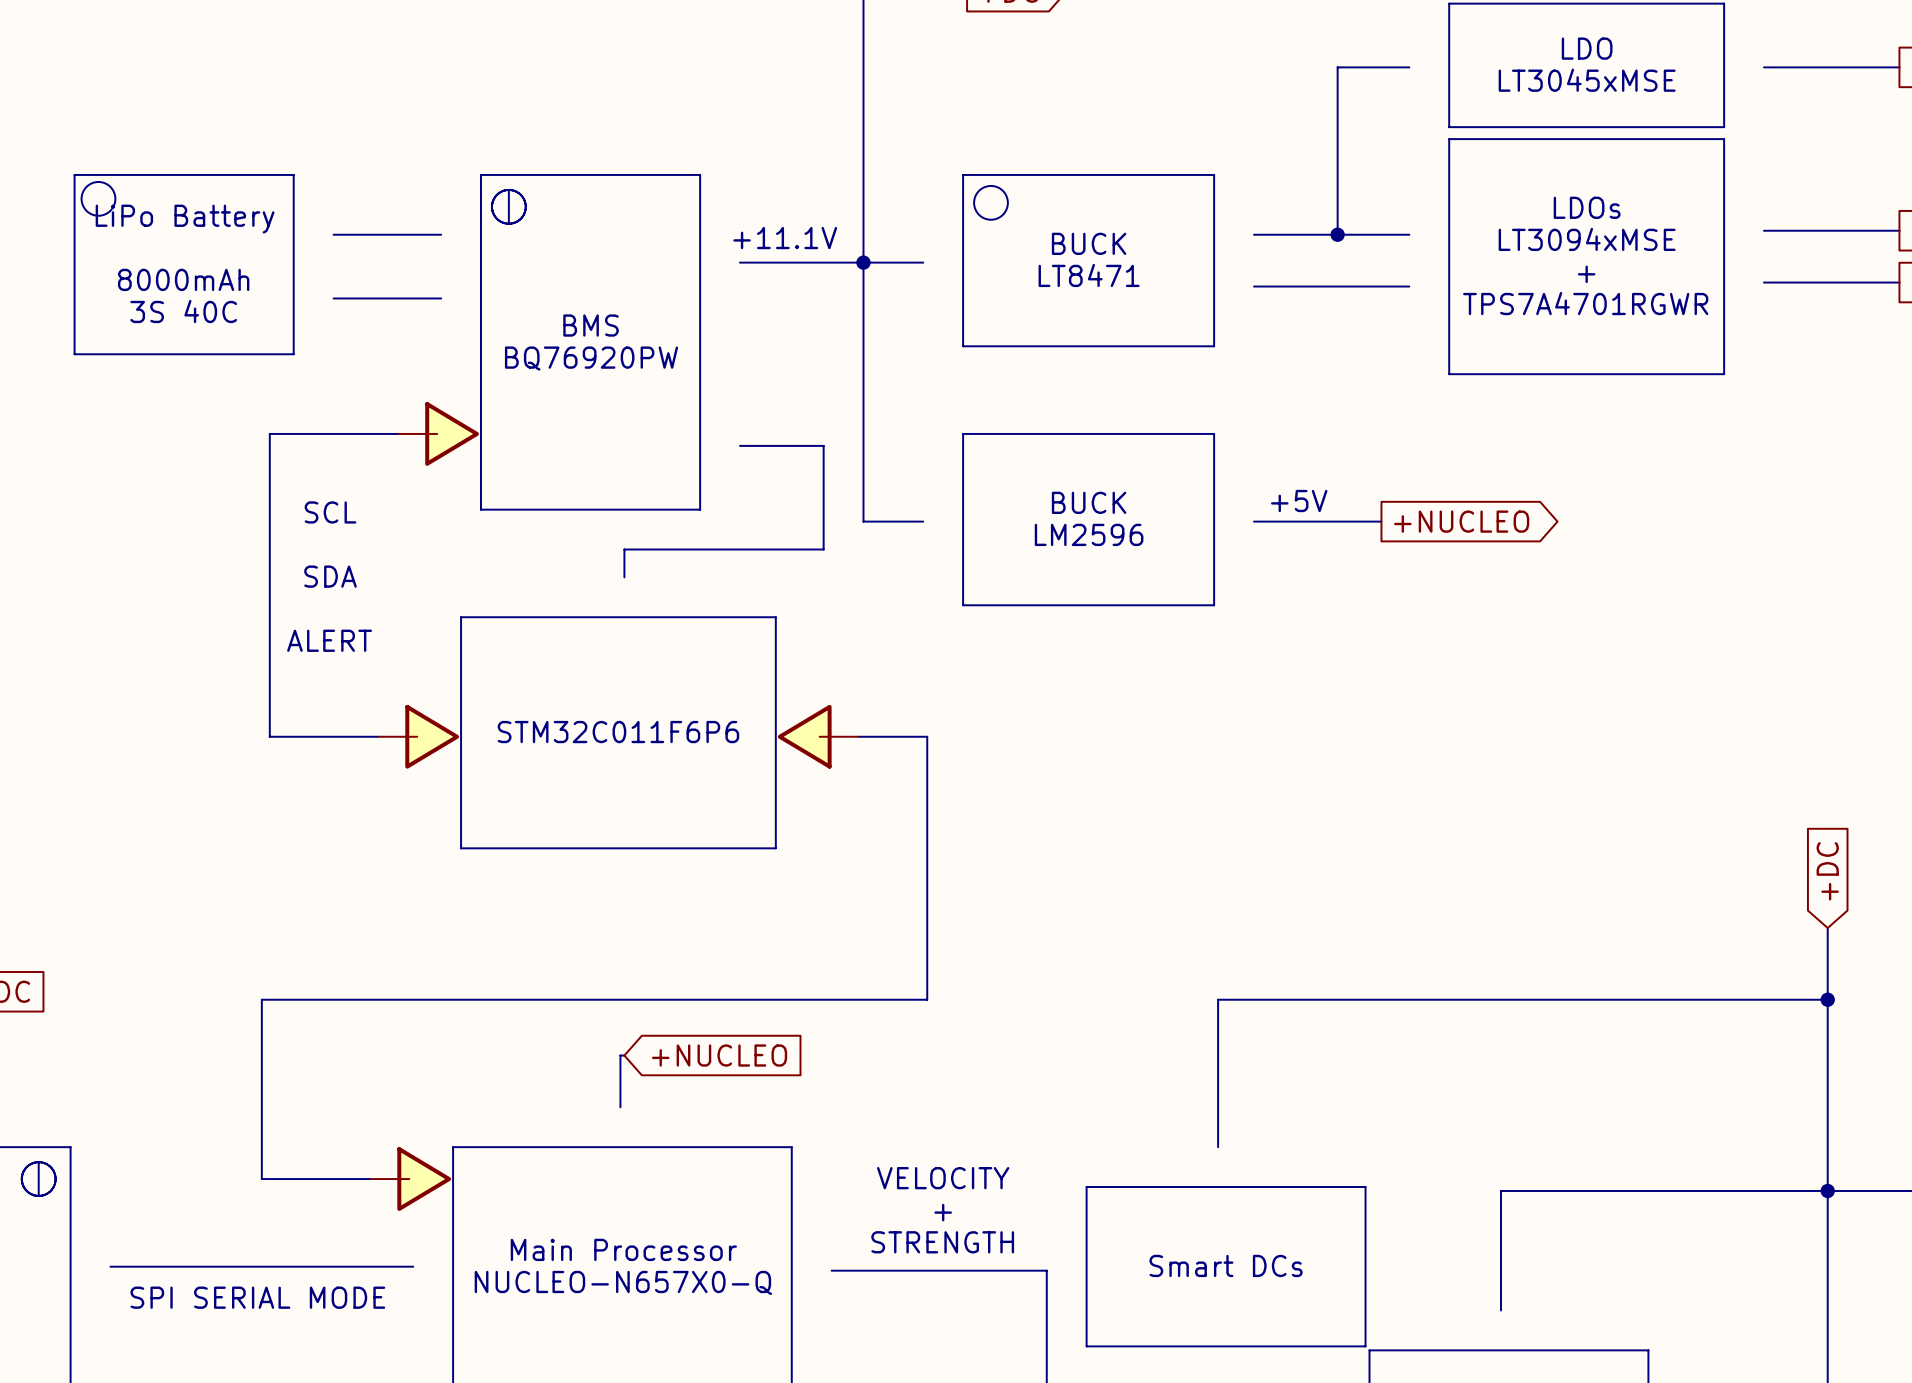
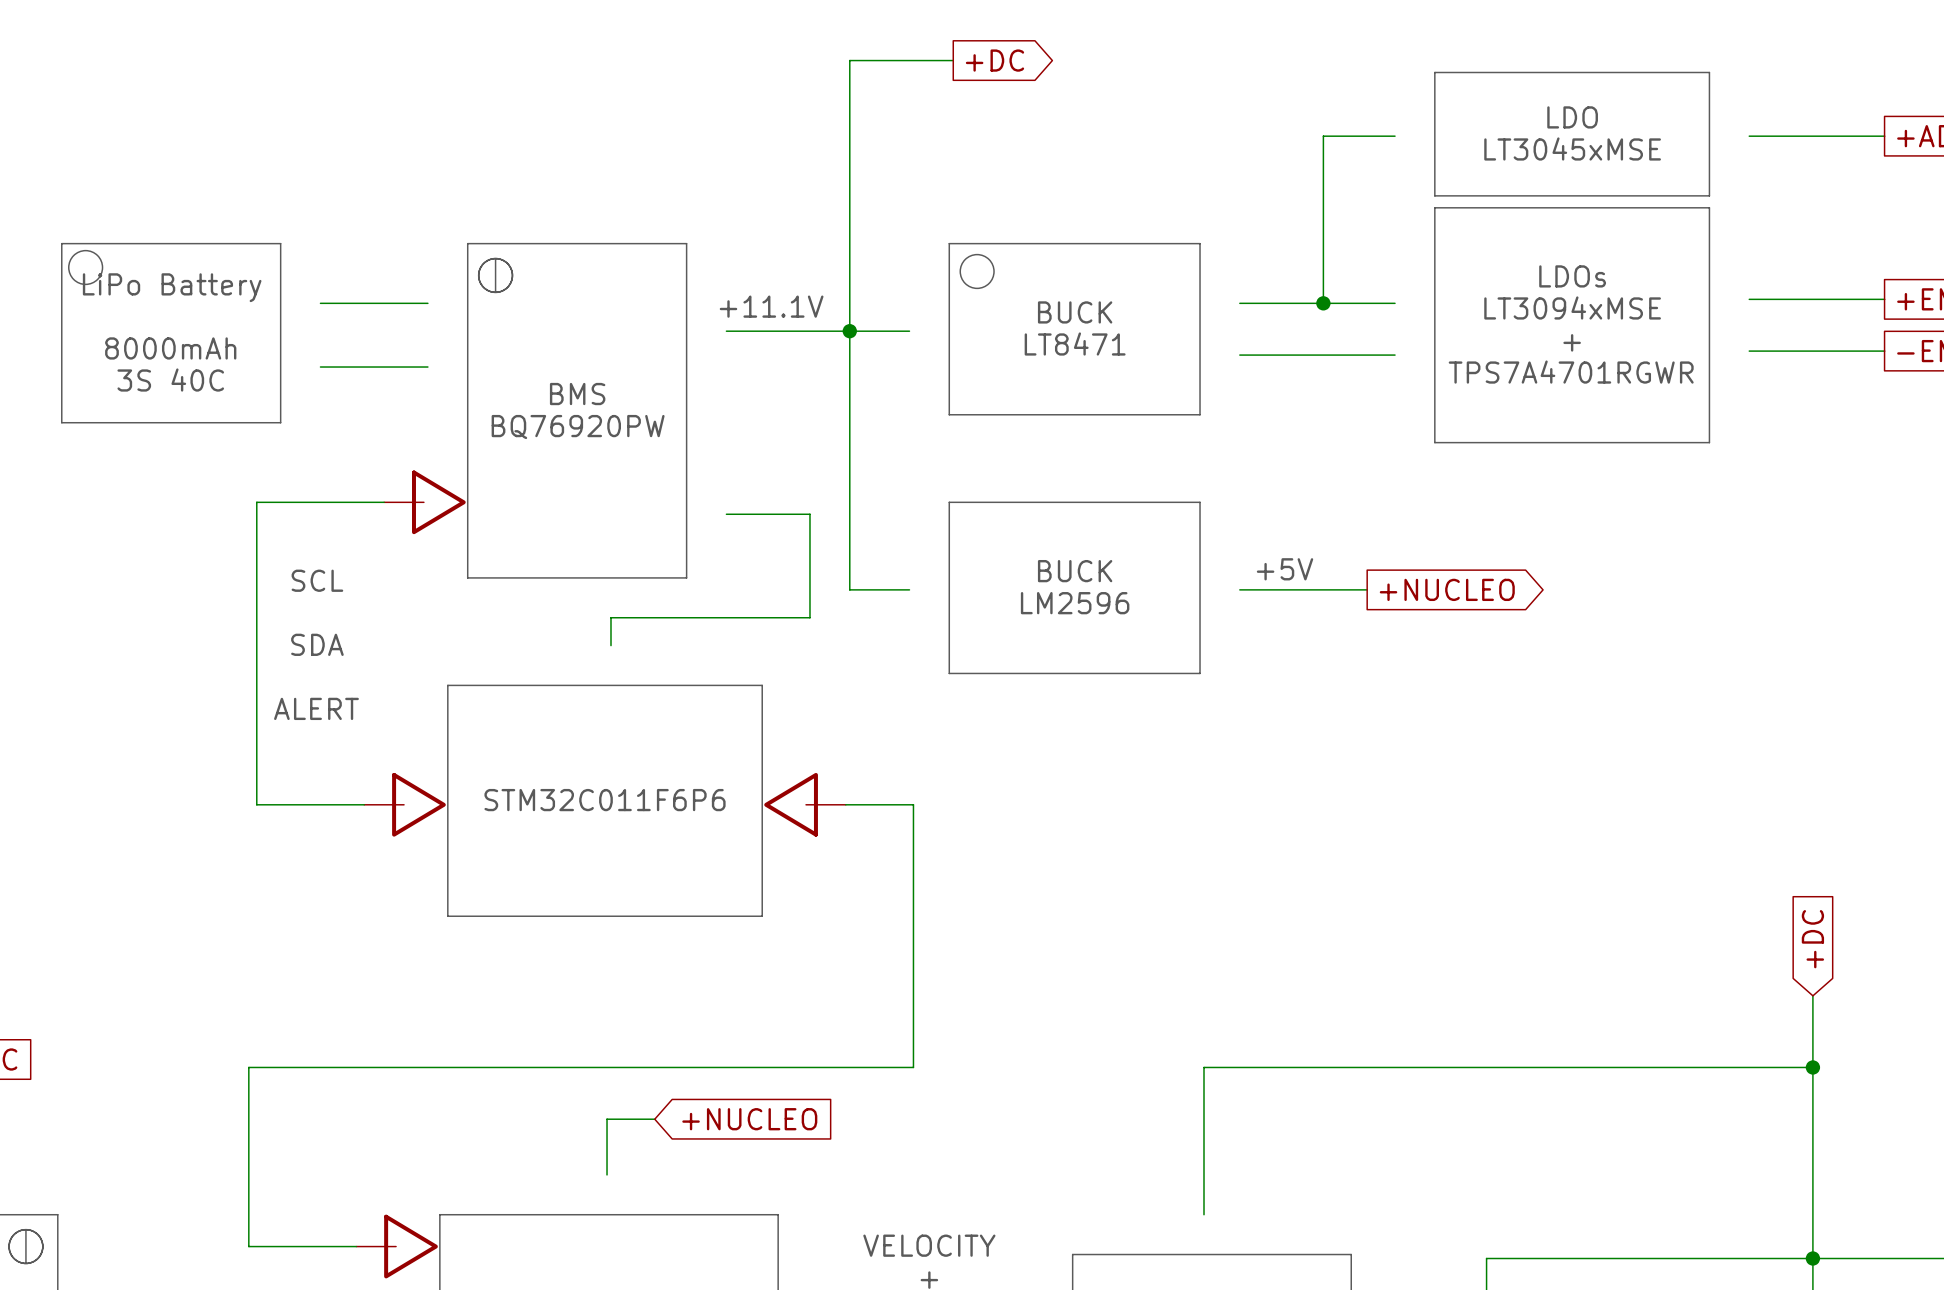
wire: (620, 1055) (624, 1055) -> (607, 1123) (607, 1119) (654, 1119)
global label position: +NUCLEO (719, 1055) -> +NUCLEO (749, 1119)

